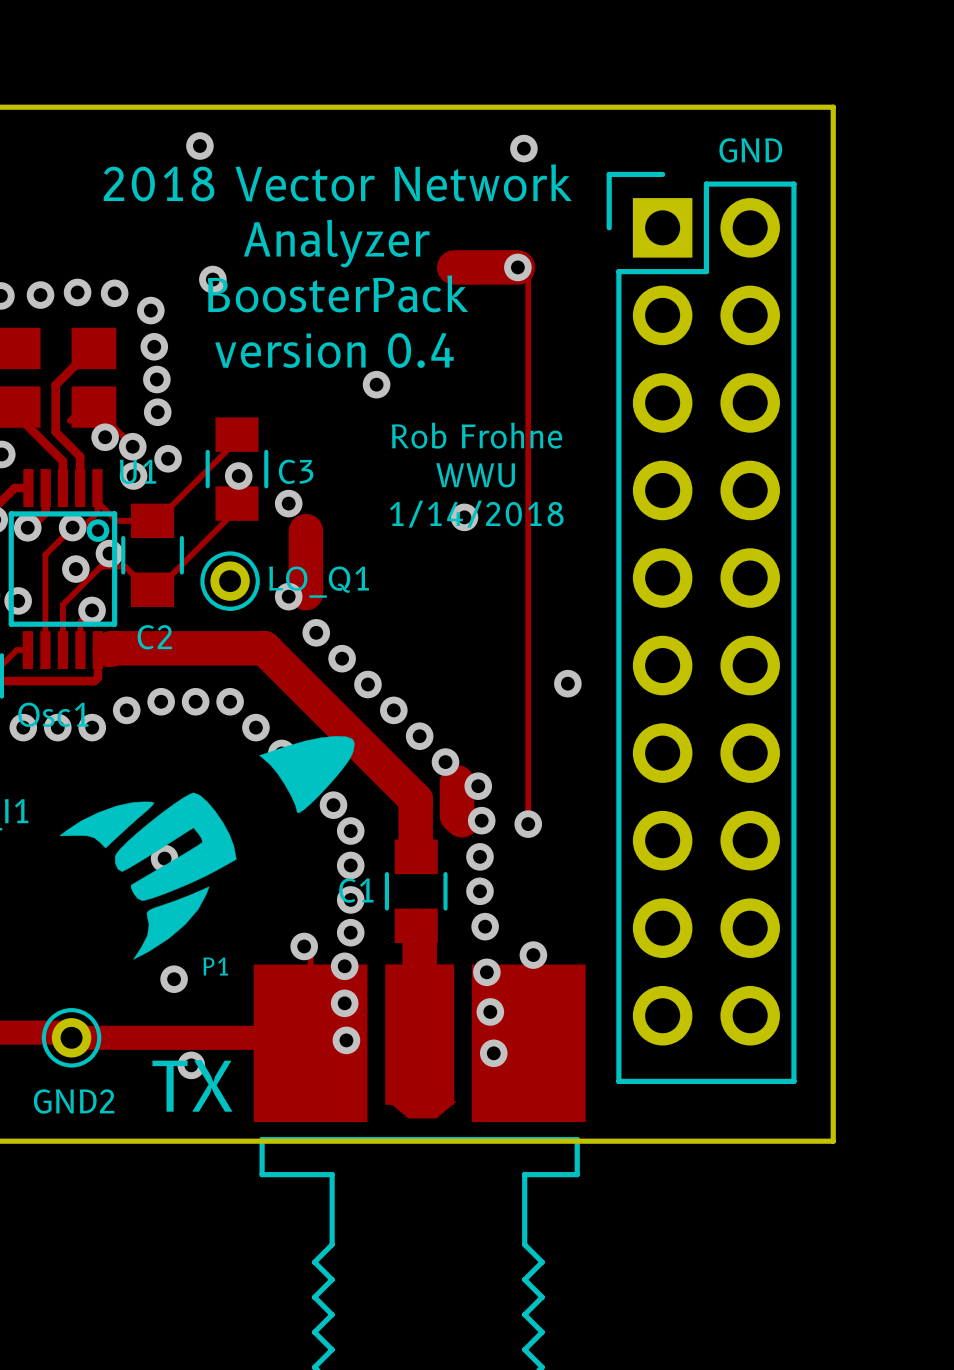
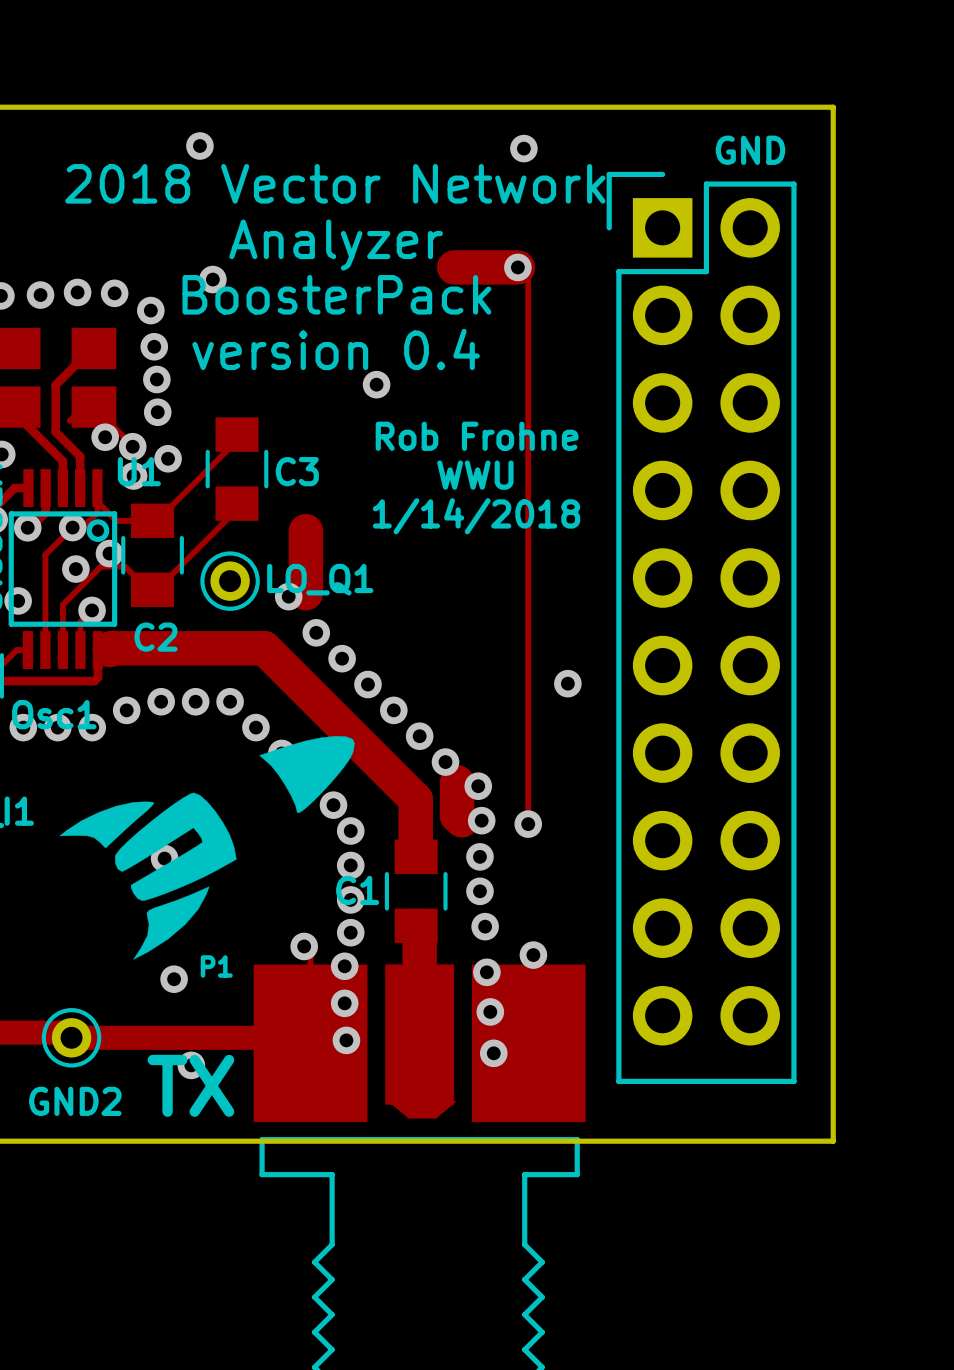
via: (238, 476) -> none
via: (288, 503) -> none
via: (464, 517) -> none

